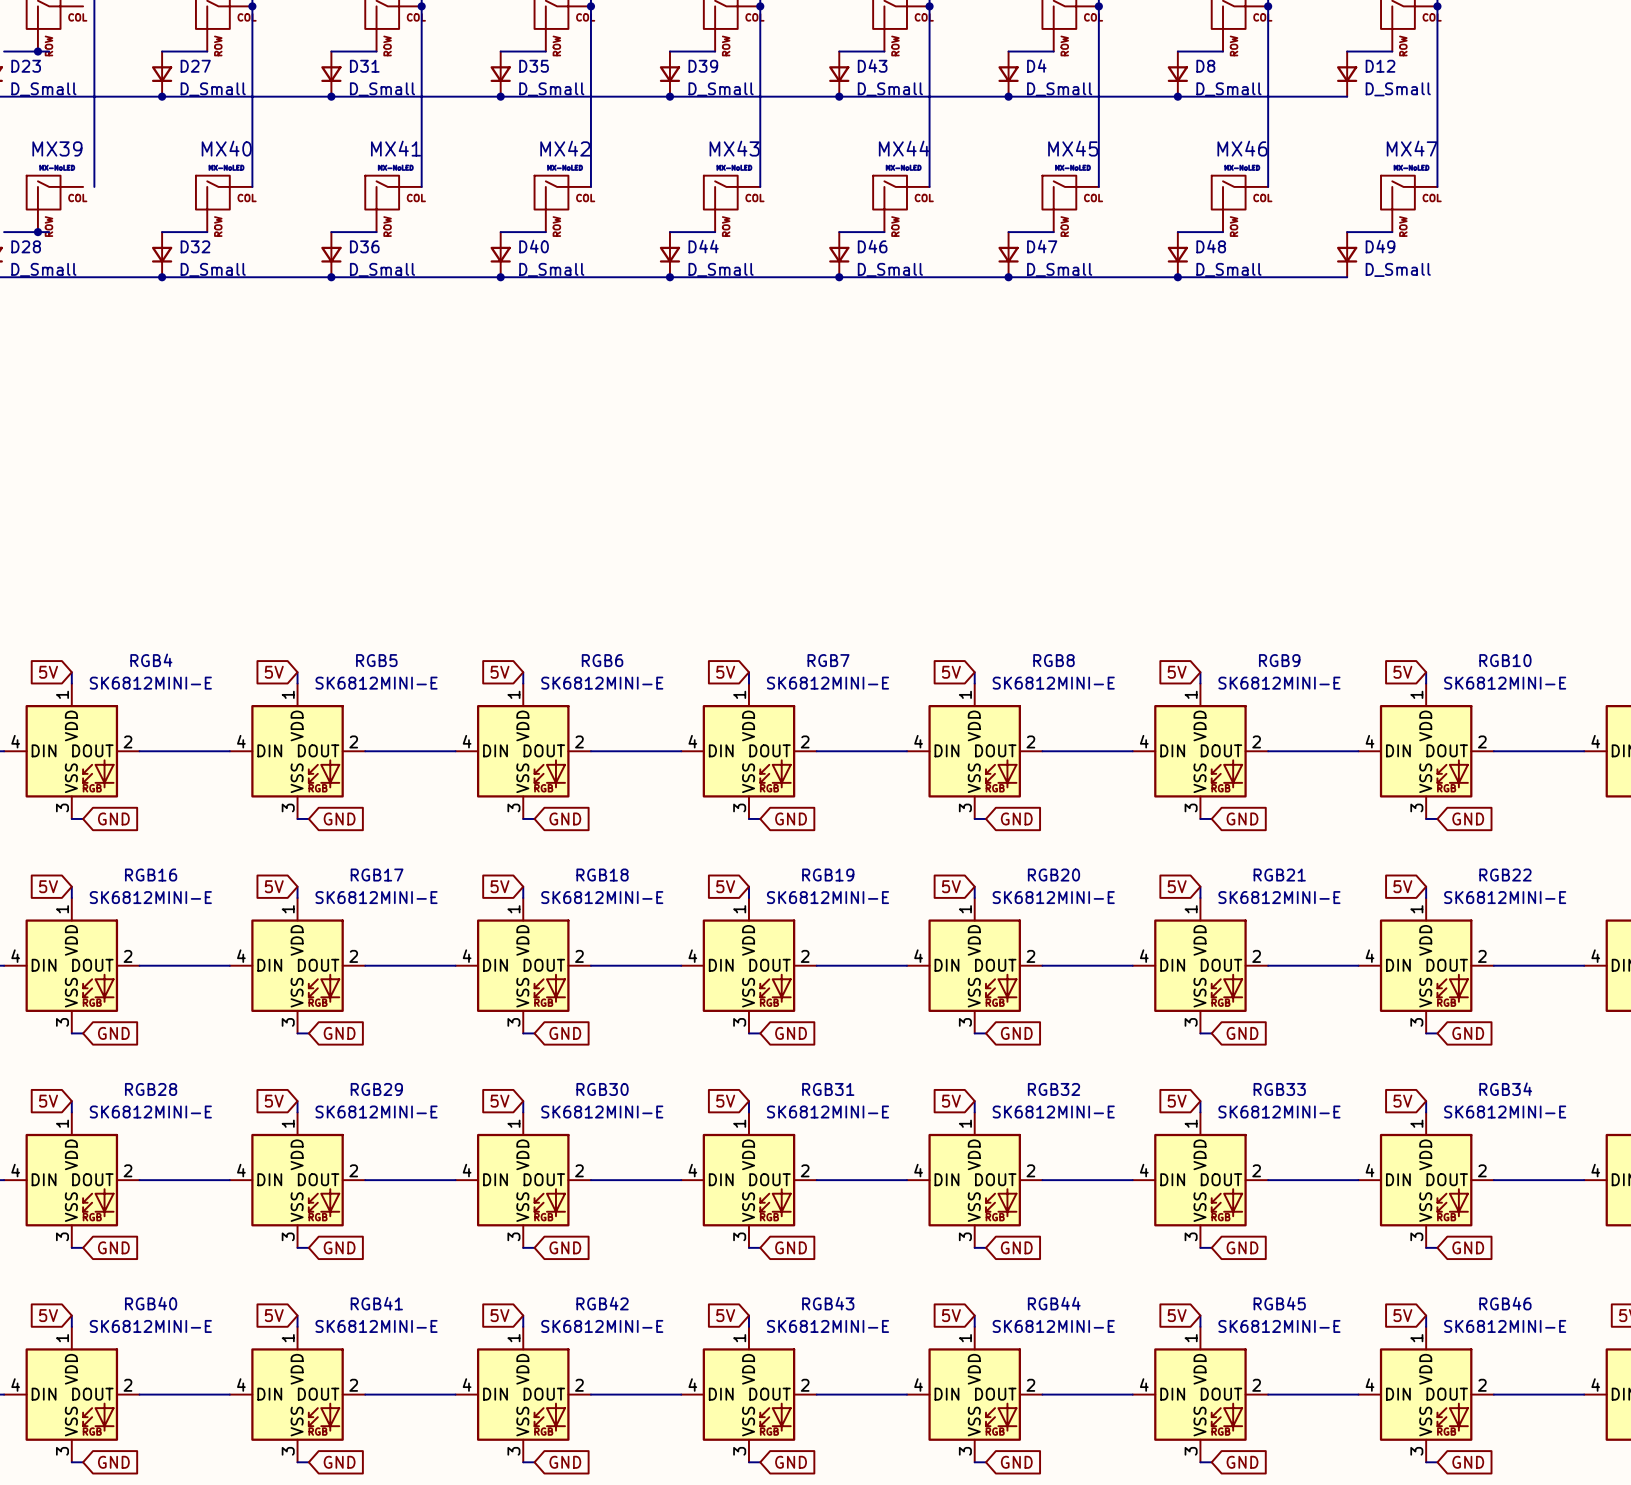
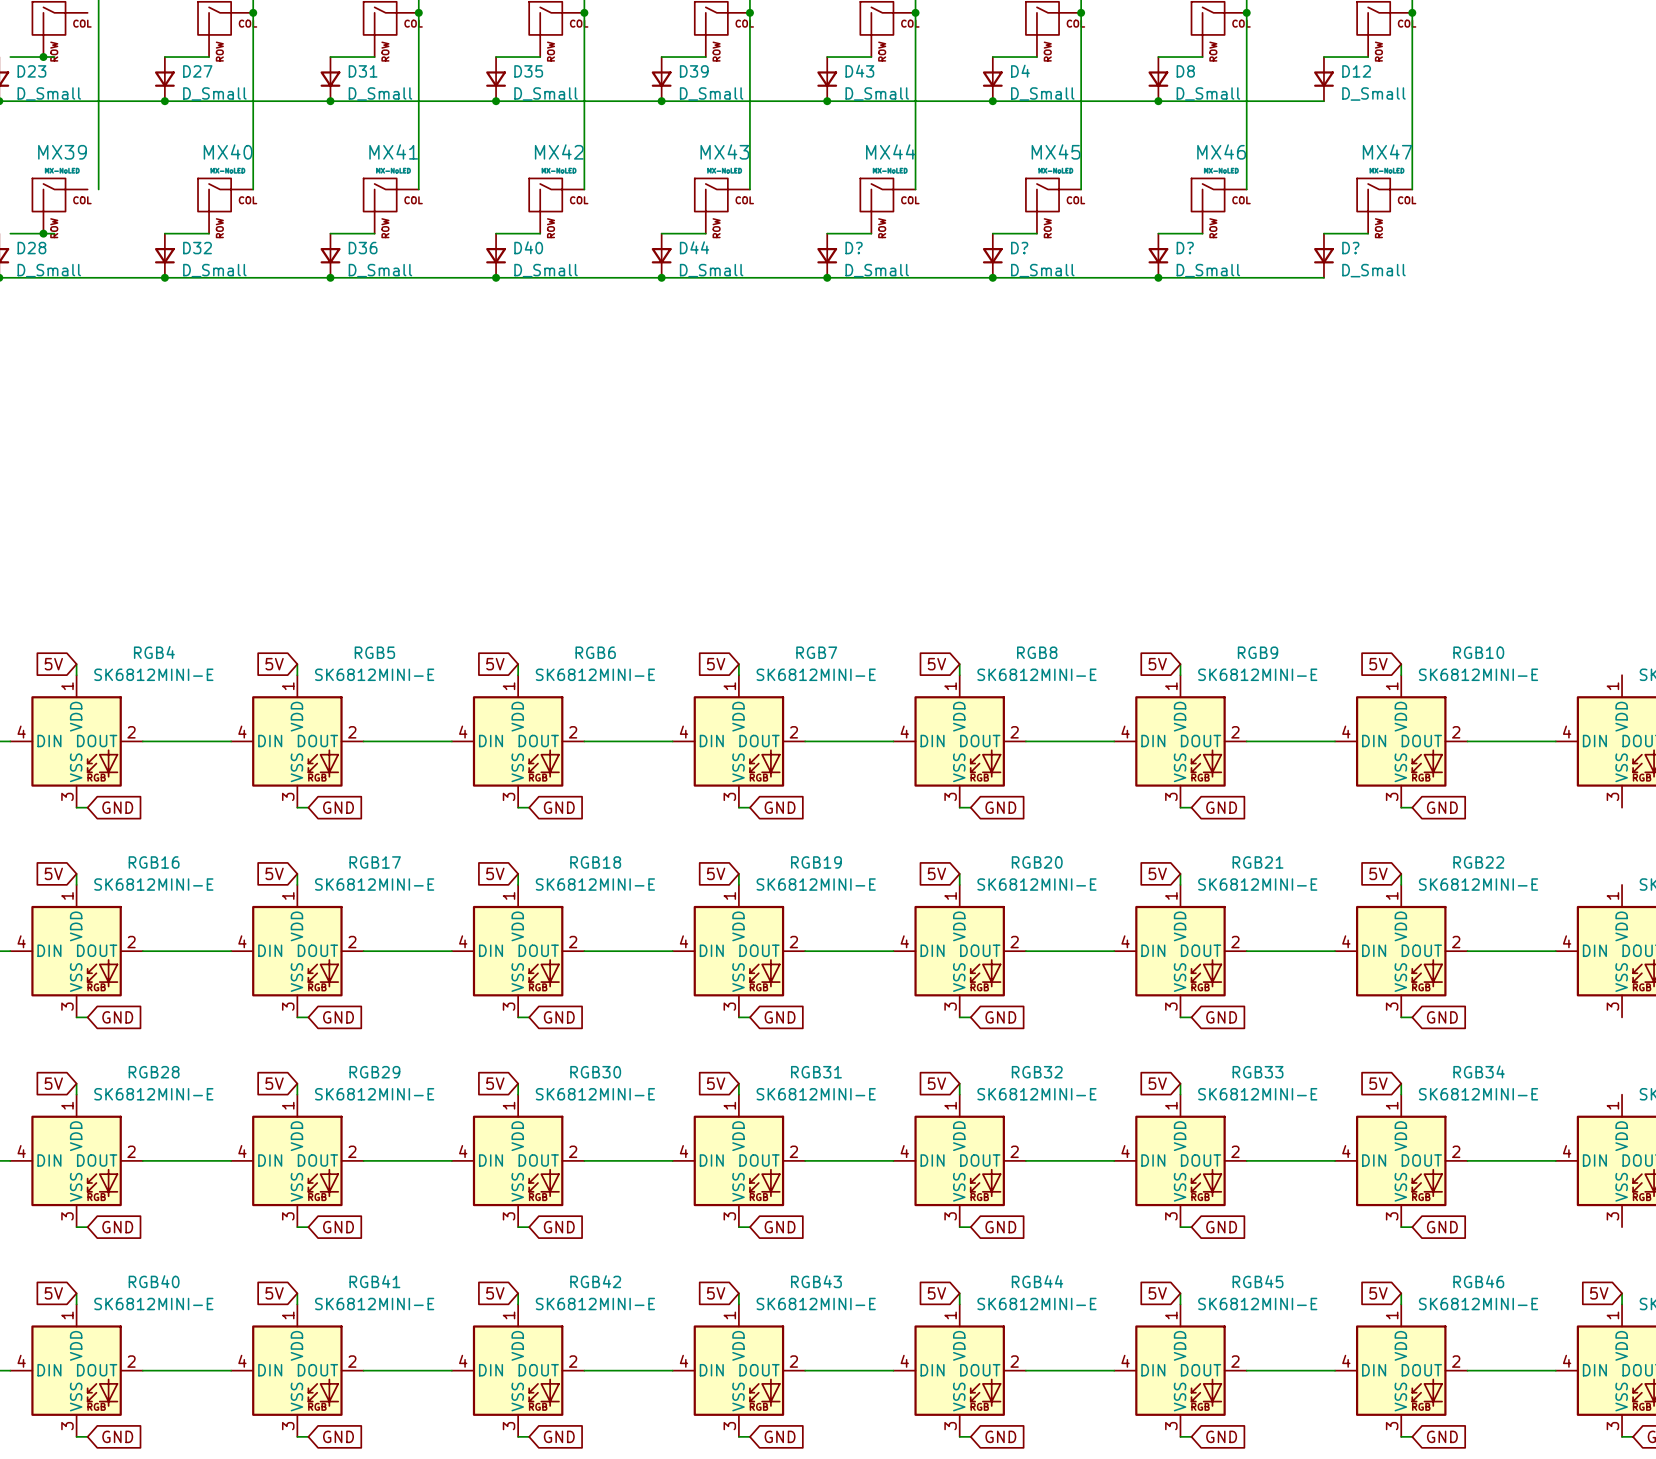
D46 name: D46 (872, 246) -> D? (854, 248)
D47 name: D47 (1042, 246) -> D? (1019, 248)
D48 name: D48 (1211, 246) -> D? (1185, 248)
D49 name: D49 (1380, 246) -> D? (1350, 248)

